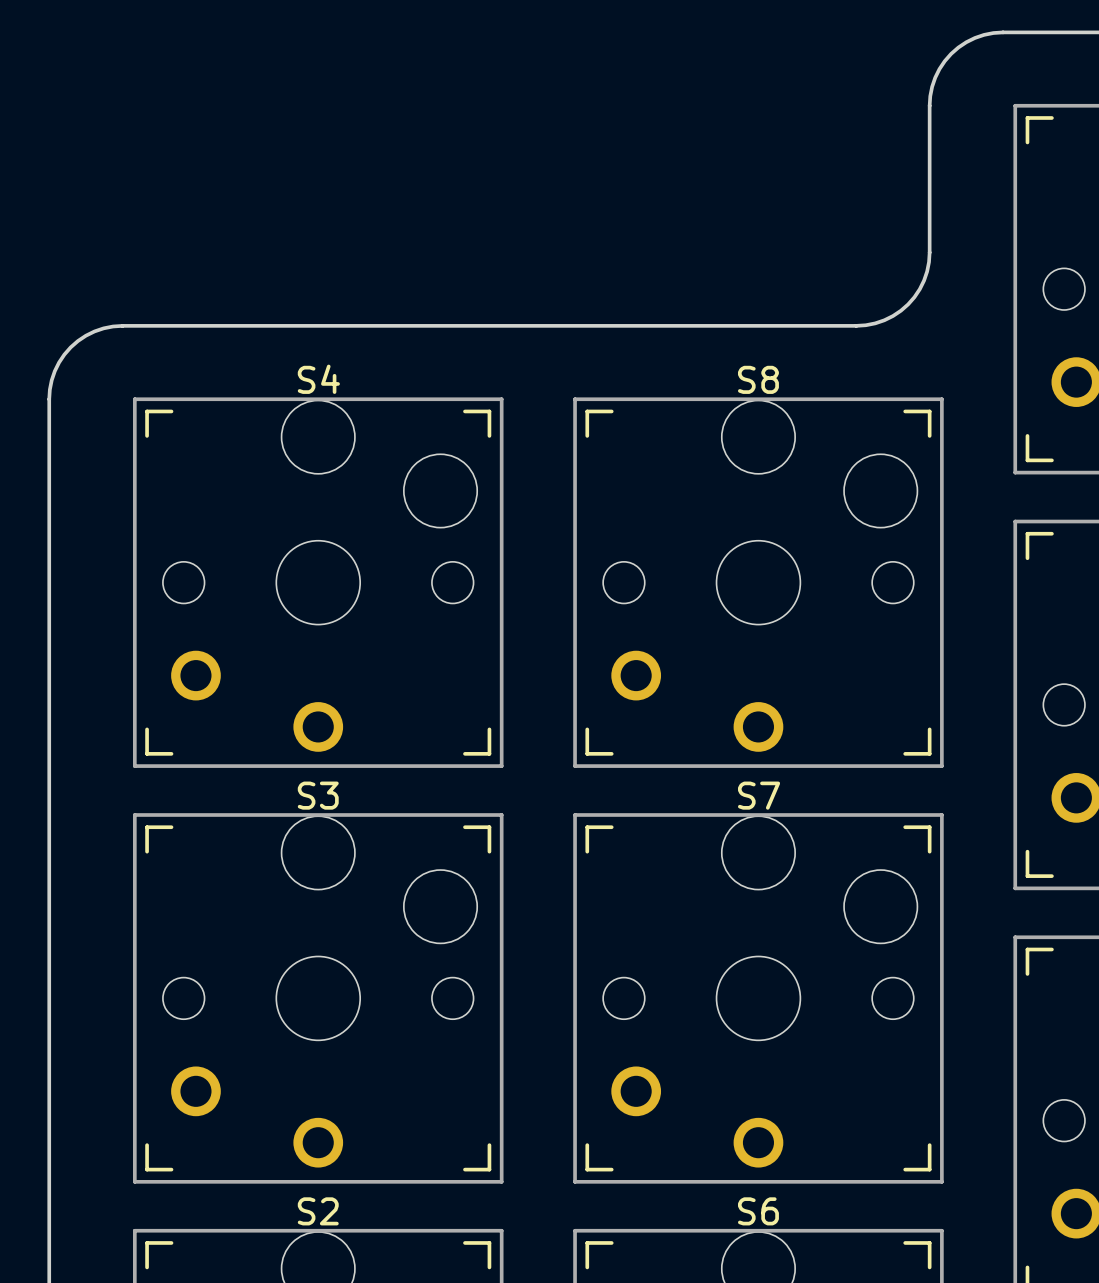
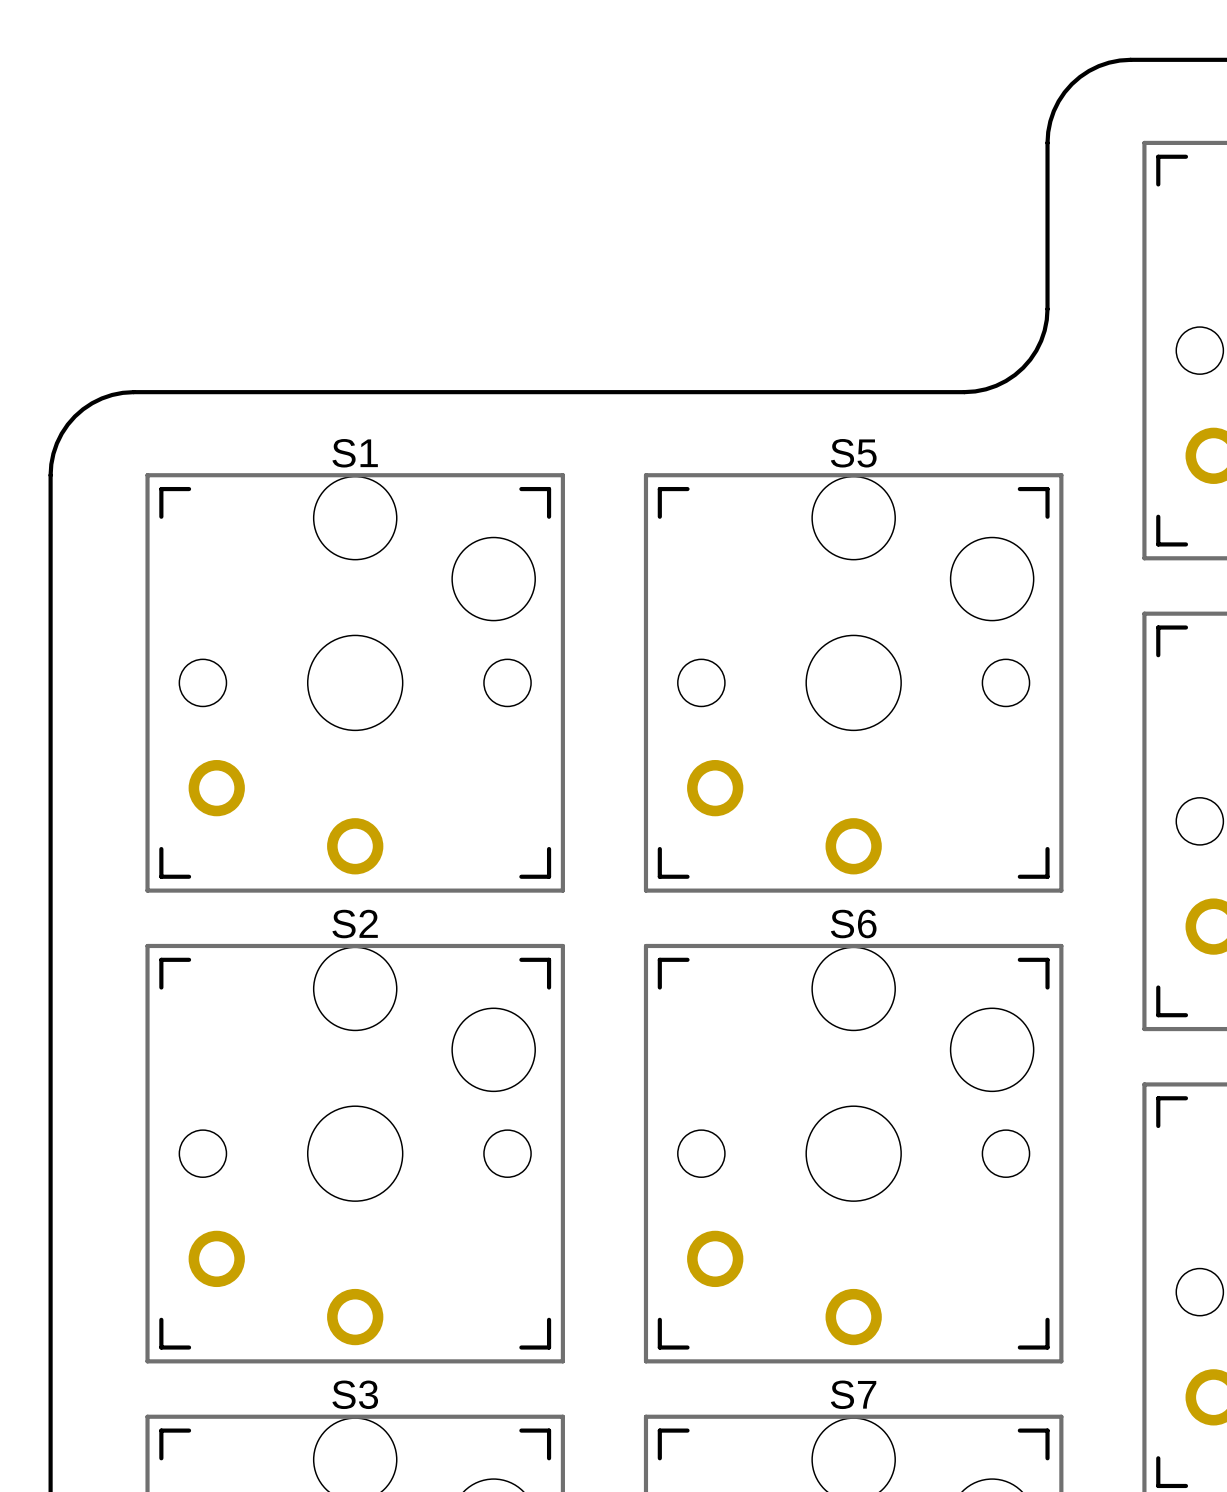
S4 name: S4 (318, 379) -> S1 (355, 453)
S8 name: S8 (758, 379) -> S5 (853, 453)
S3 name: S3 (318, 795) -> S2 (355, 924)
S7 name: S7 (759, 795) -> S6 (853, 924)
S2 name: S2 (318, 1211) -> S3 (355, 1394)
S6 name: S6 (758, 1211) -> S7 (853, 1394)

